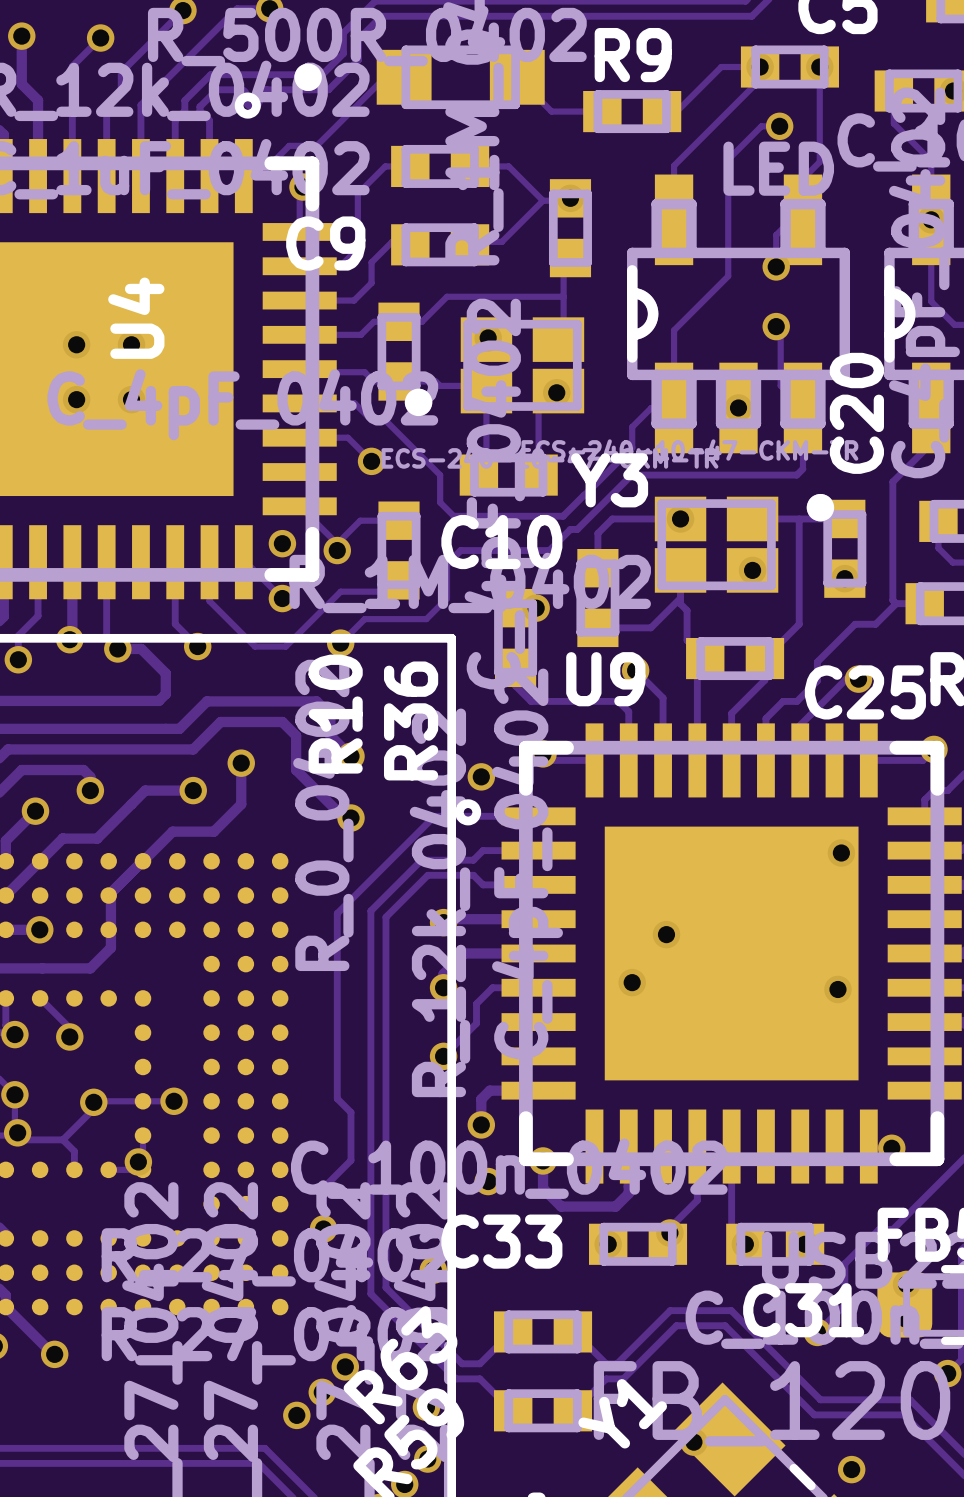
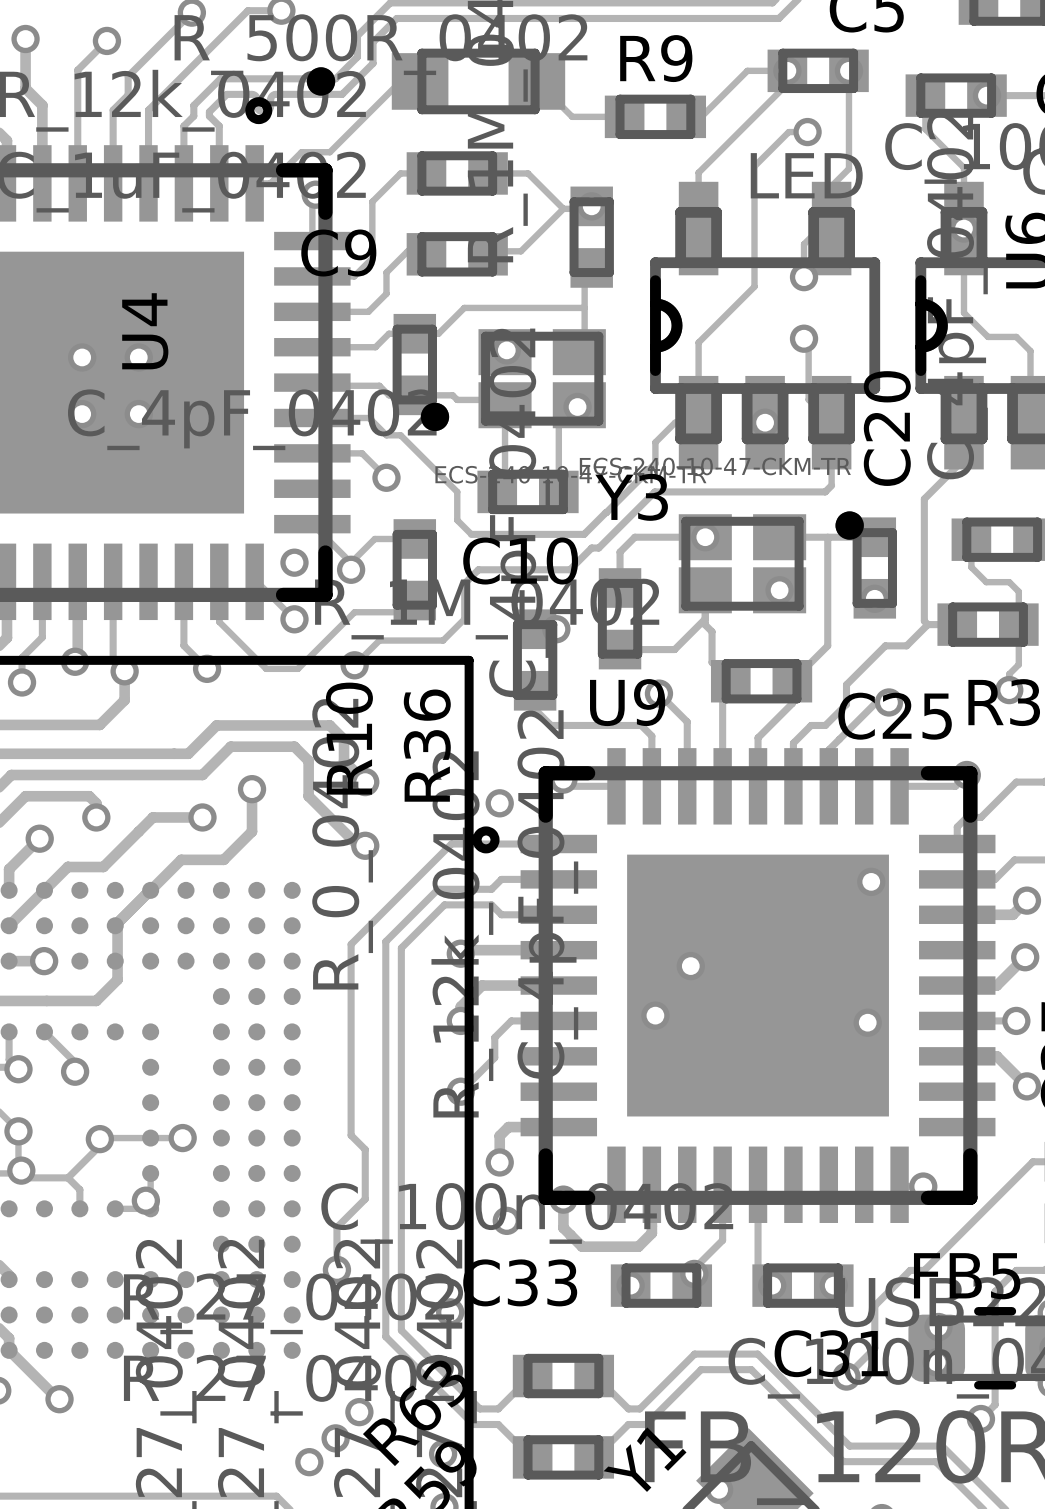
track: (117, 648) (141, 648) (165, 673) (165, 694) (158, 700) (93, 700) -> (124, 671) (124, 700) (99, 724)

